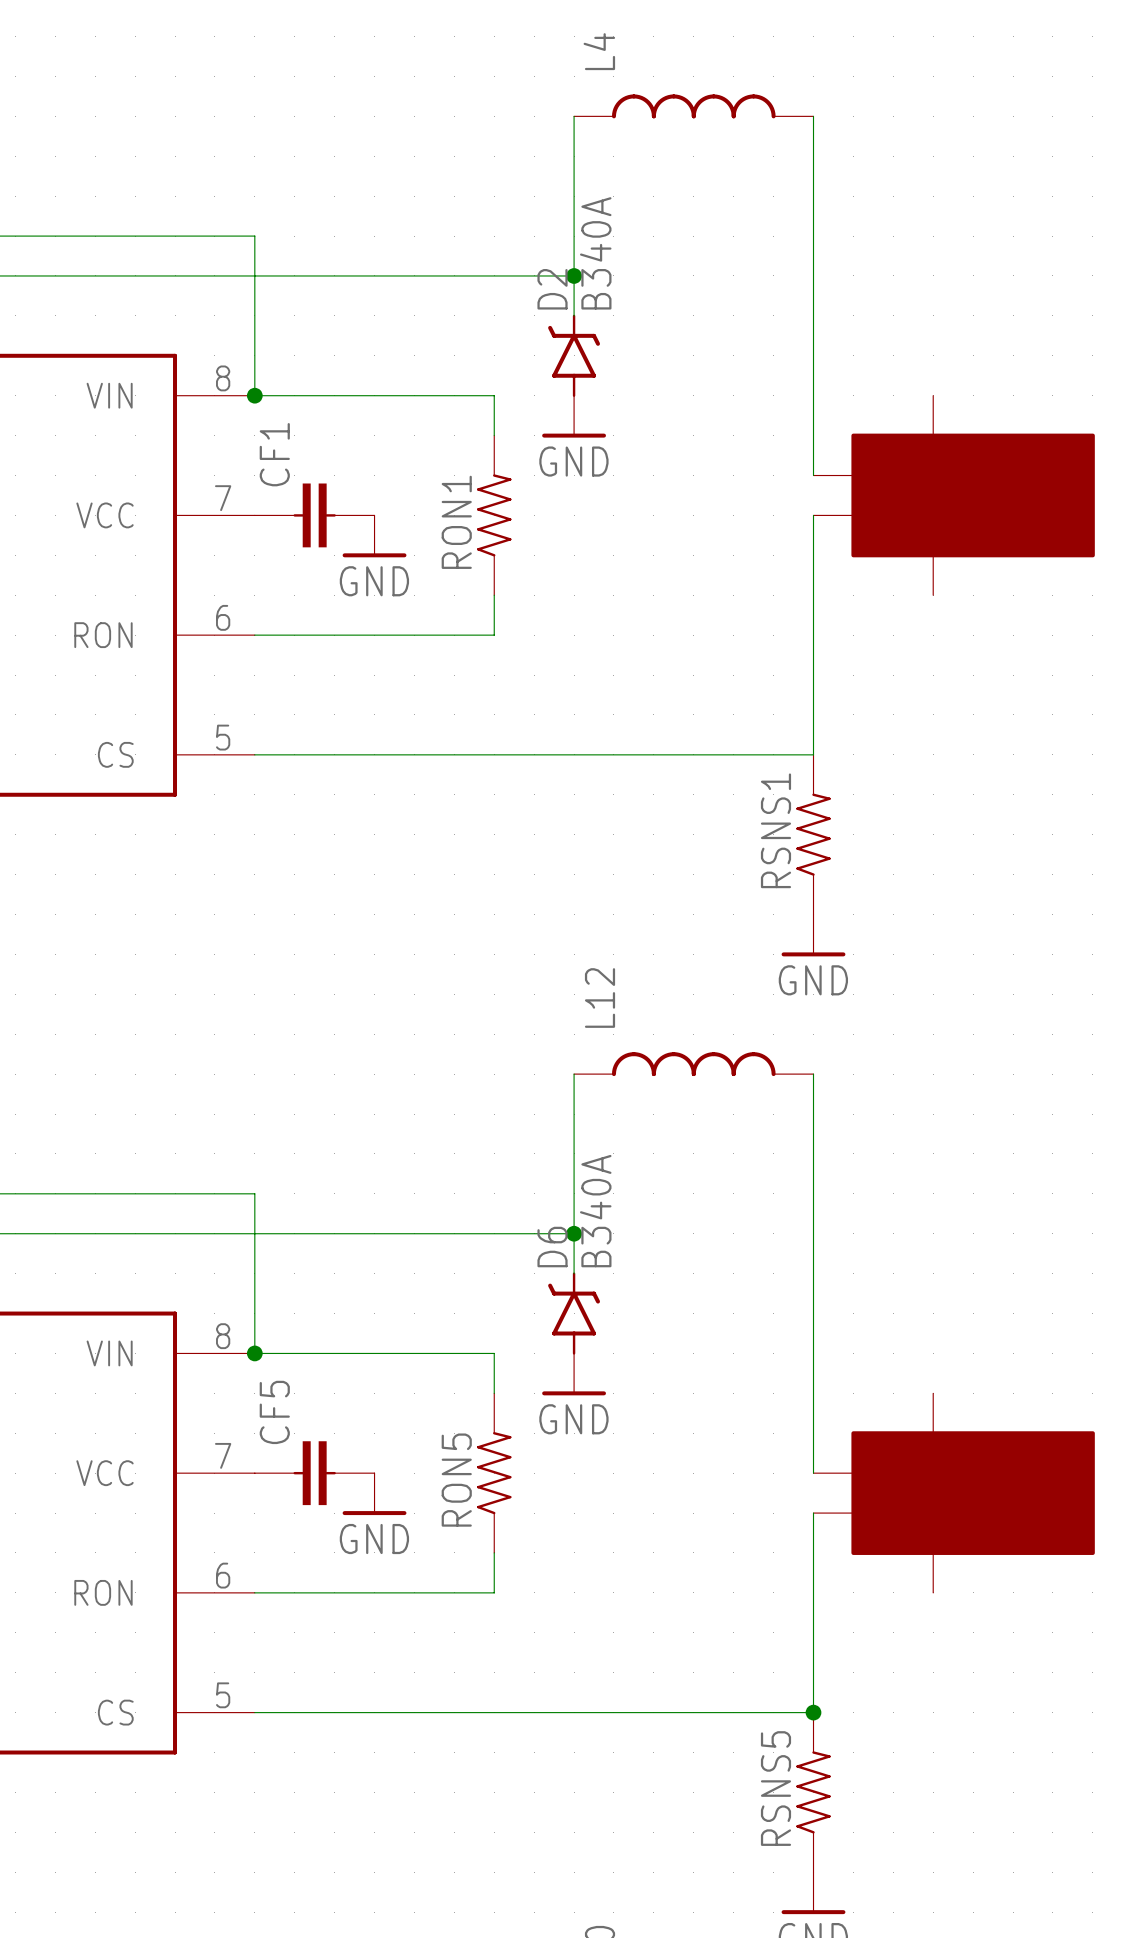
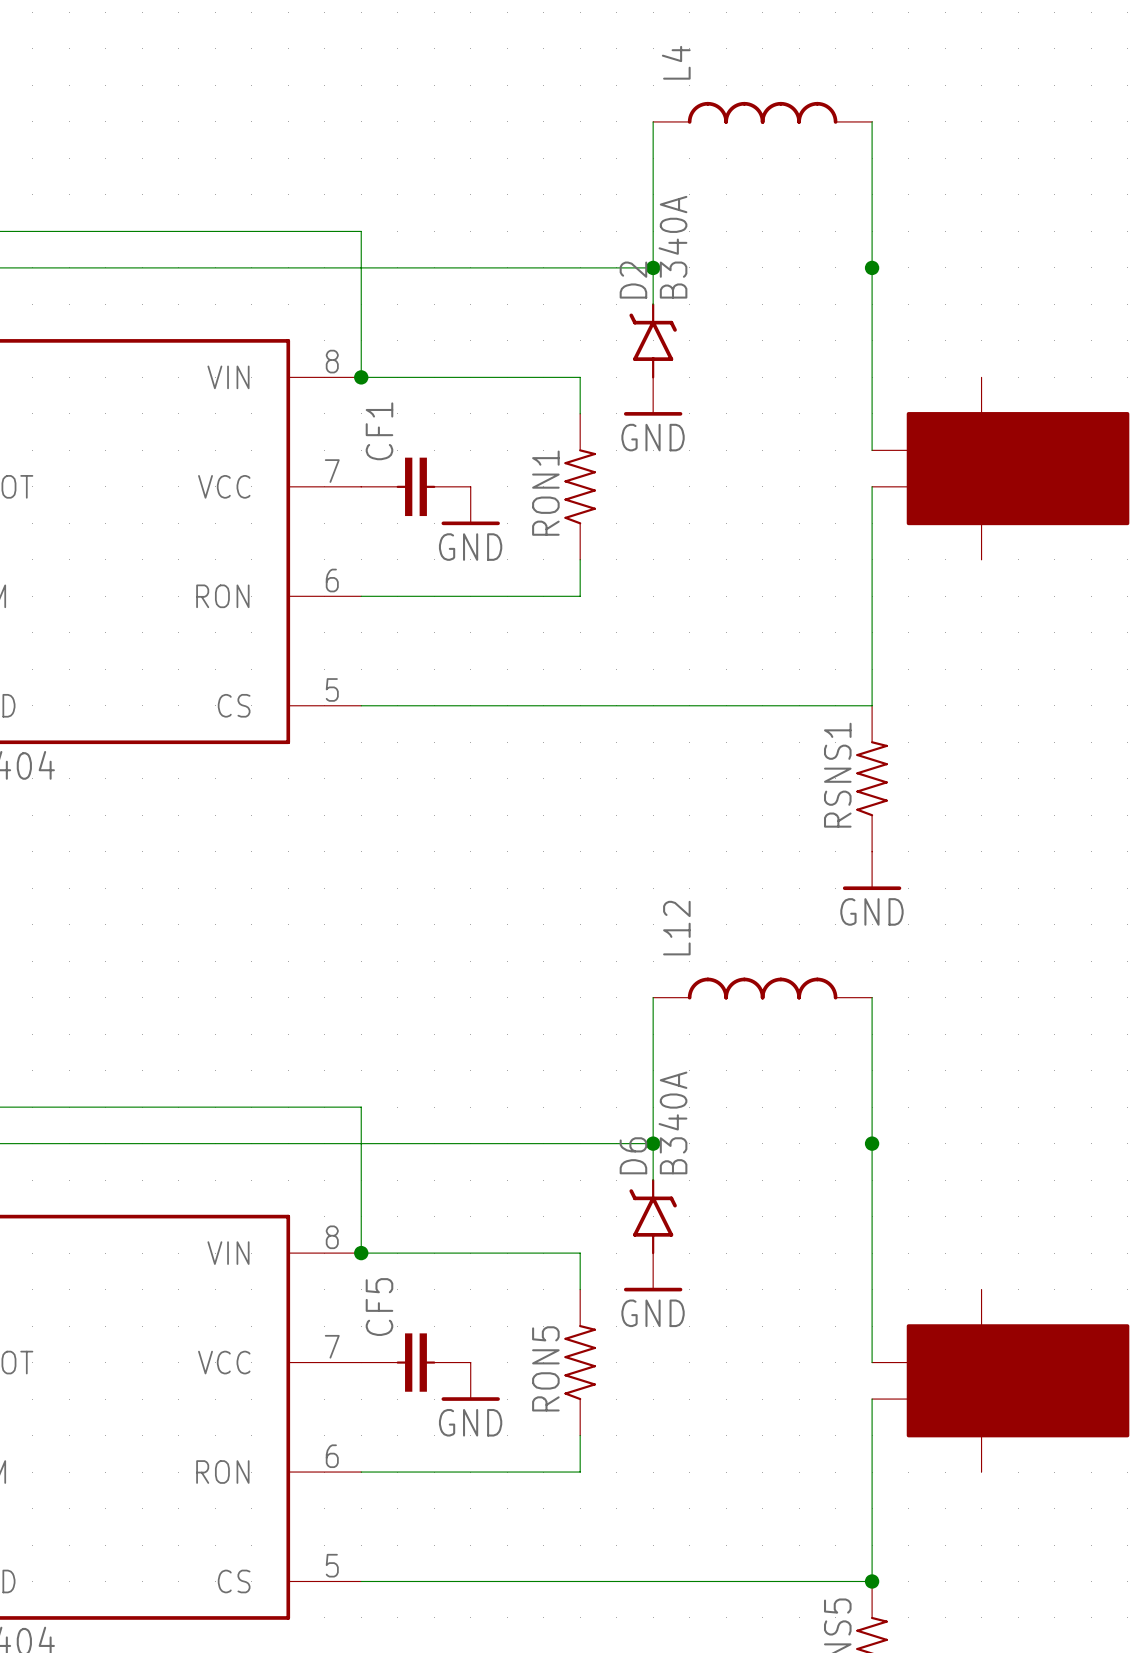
junction: none -> (872, 267)
junction: none -> (872, 1143)

